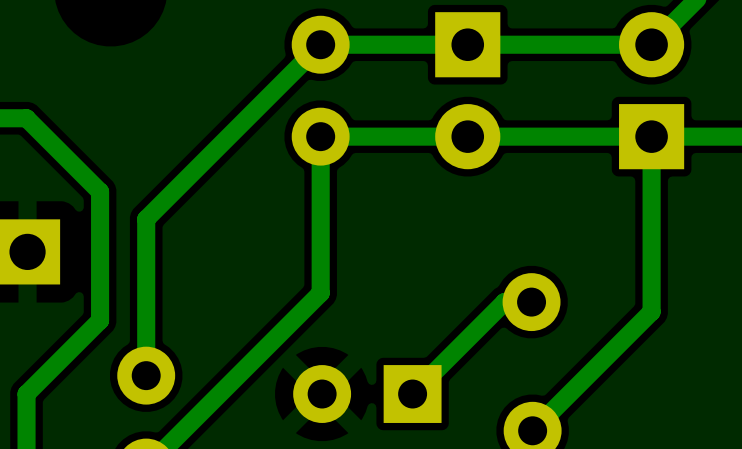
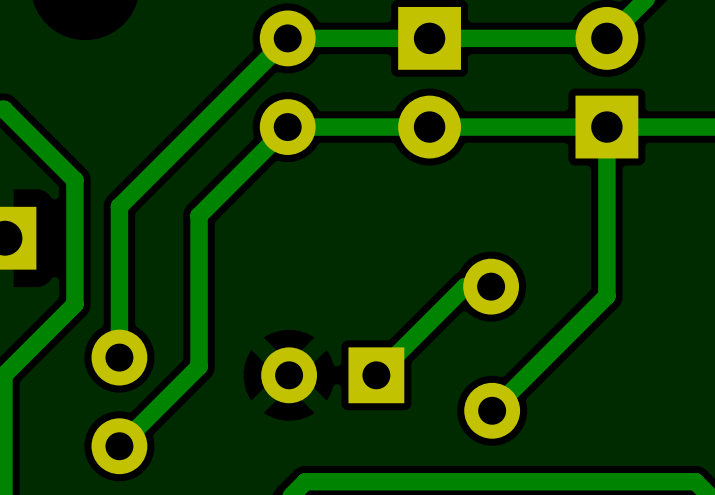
track: (320, 136) (320, 293) (228, 385) -> (287, 127) (199, 215) (199, 366)

